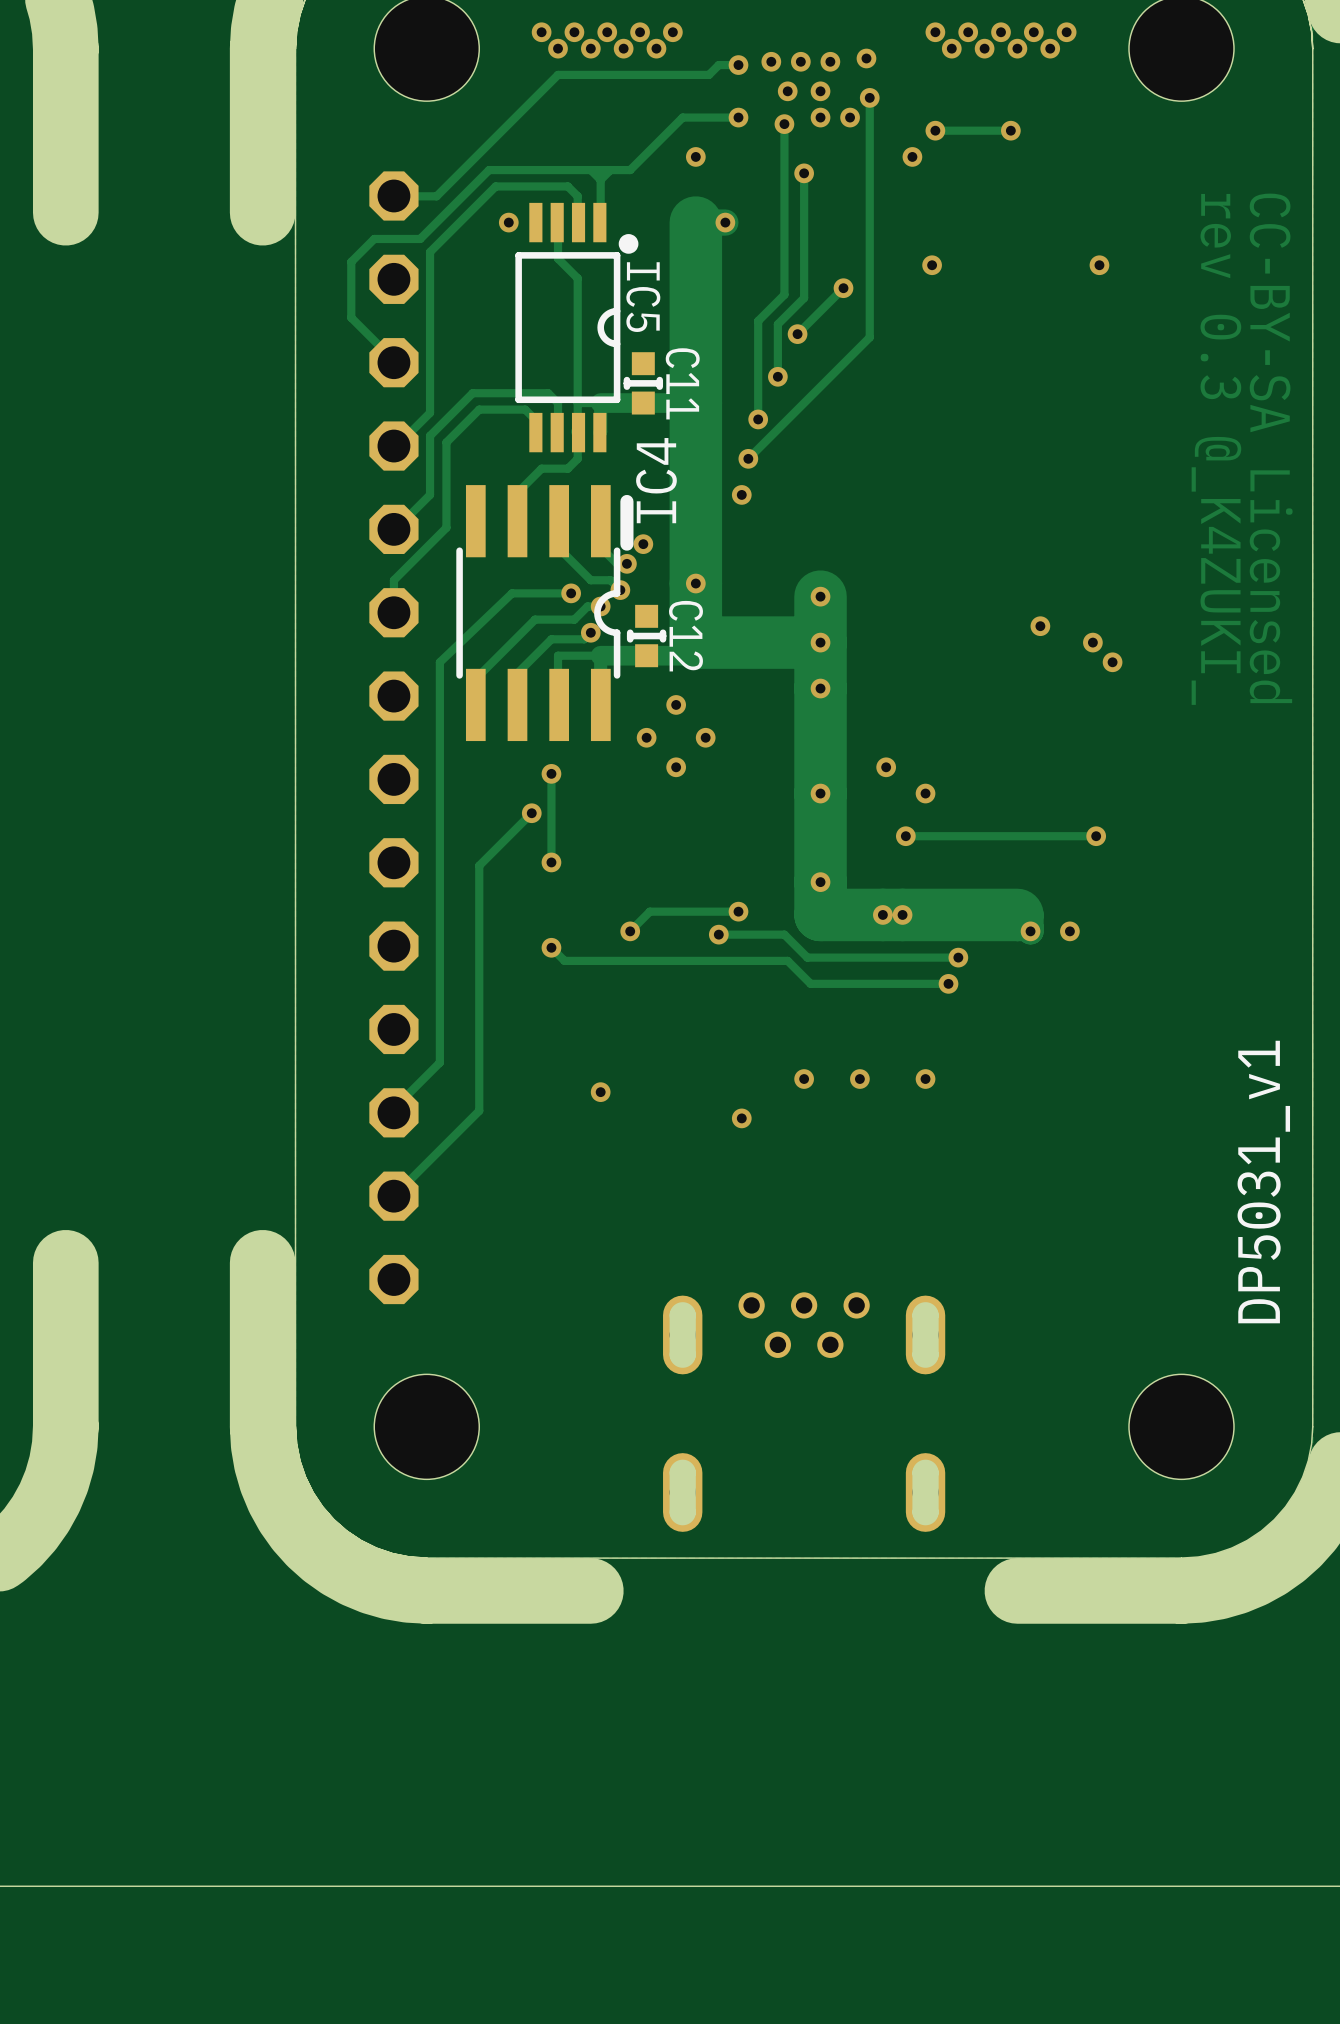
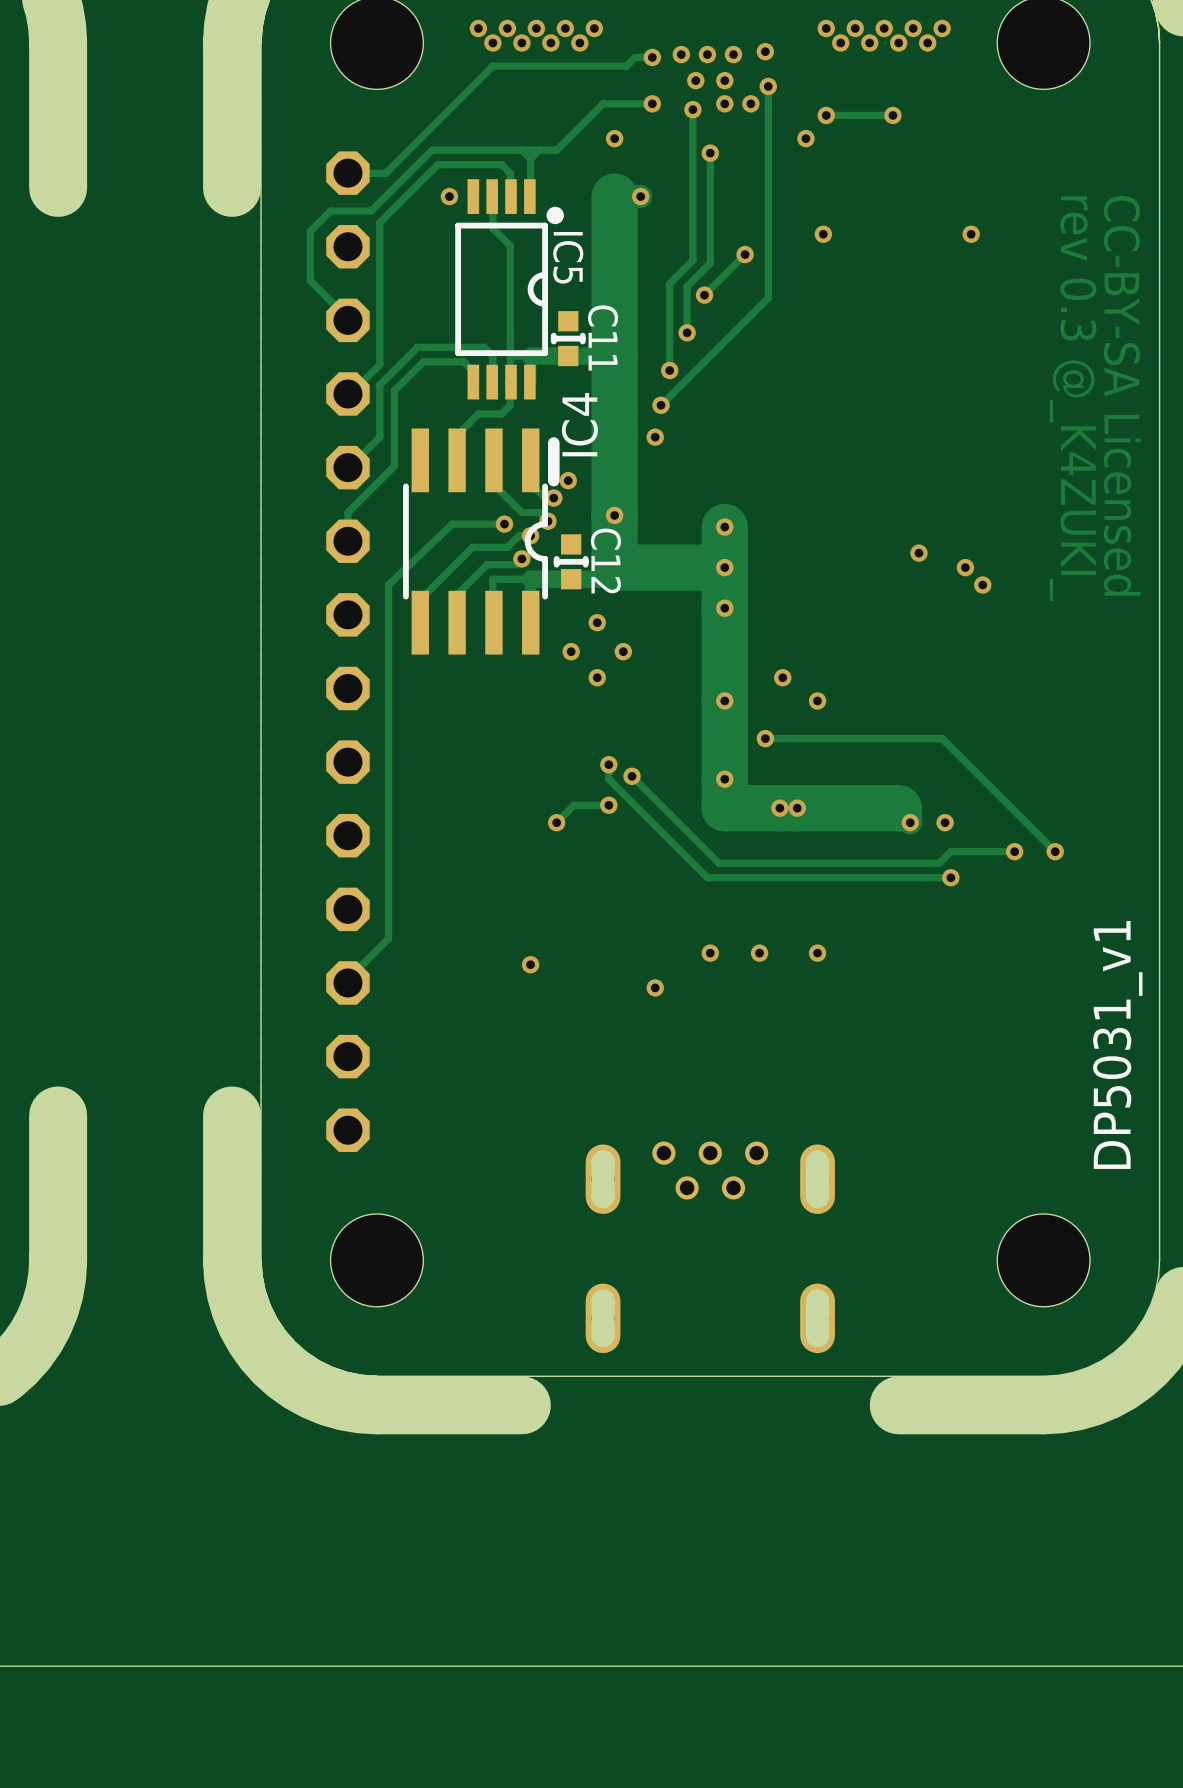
track: (551, 773) (551, 862) -> none
via: (551, 773) -> none
track: (531, 813) (479, 865) (479, 1110) (393, 1196) -> none
via: (531, 813) -> none
track: none -> (800, 738) (765, 738)
via position: (905, 836) -> (765, 738)
track: (1096, 836) (1066, 836) -> (1055, 851) (942, 738)
via: (1096, 836) -> none
via: (551, 862) -> none
track: none -> (608, 764) (608, 779) (707, 877) (950, 877)
via: none -> (608, 764)
track: none -> (632, 776) (718, 863) (939, 863) (950, 851) (1014, 851)
via: none -> (632, 776)
via: none -> (608, 805)
track: (738, 911) (689, 911) -> none
via: (738, 911) -> none
track: (718, 934) (784, 934) (807, 957) (958, 957) -> none
via: (718, 934) -> none
track: (551, 947) (564, 960) (787, 960) (810, 983) (948, 983) -> none
via: (551, 947) -> none
via: (958, 957) -> none
via: none -> (1014, 851)
via: none -> (1055, 851)
via: (948, 983) -> none
via: none -> (950, 877)

